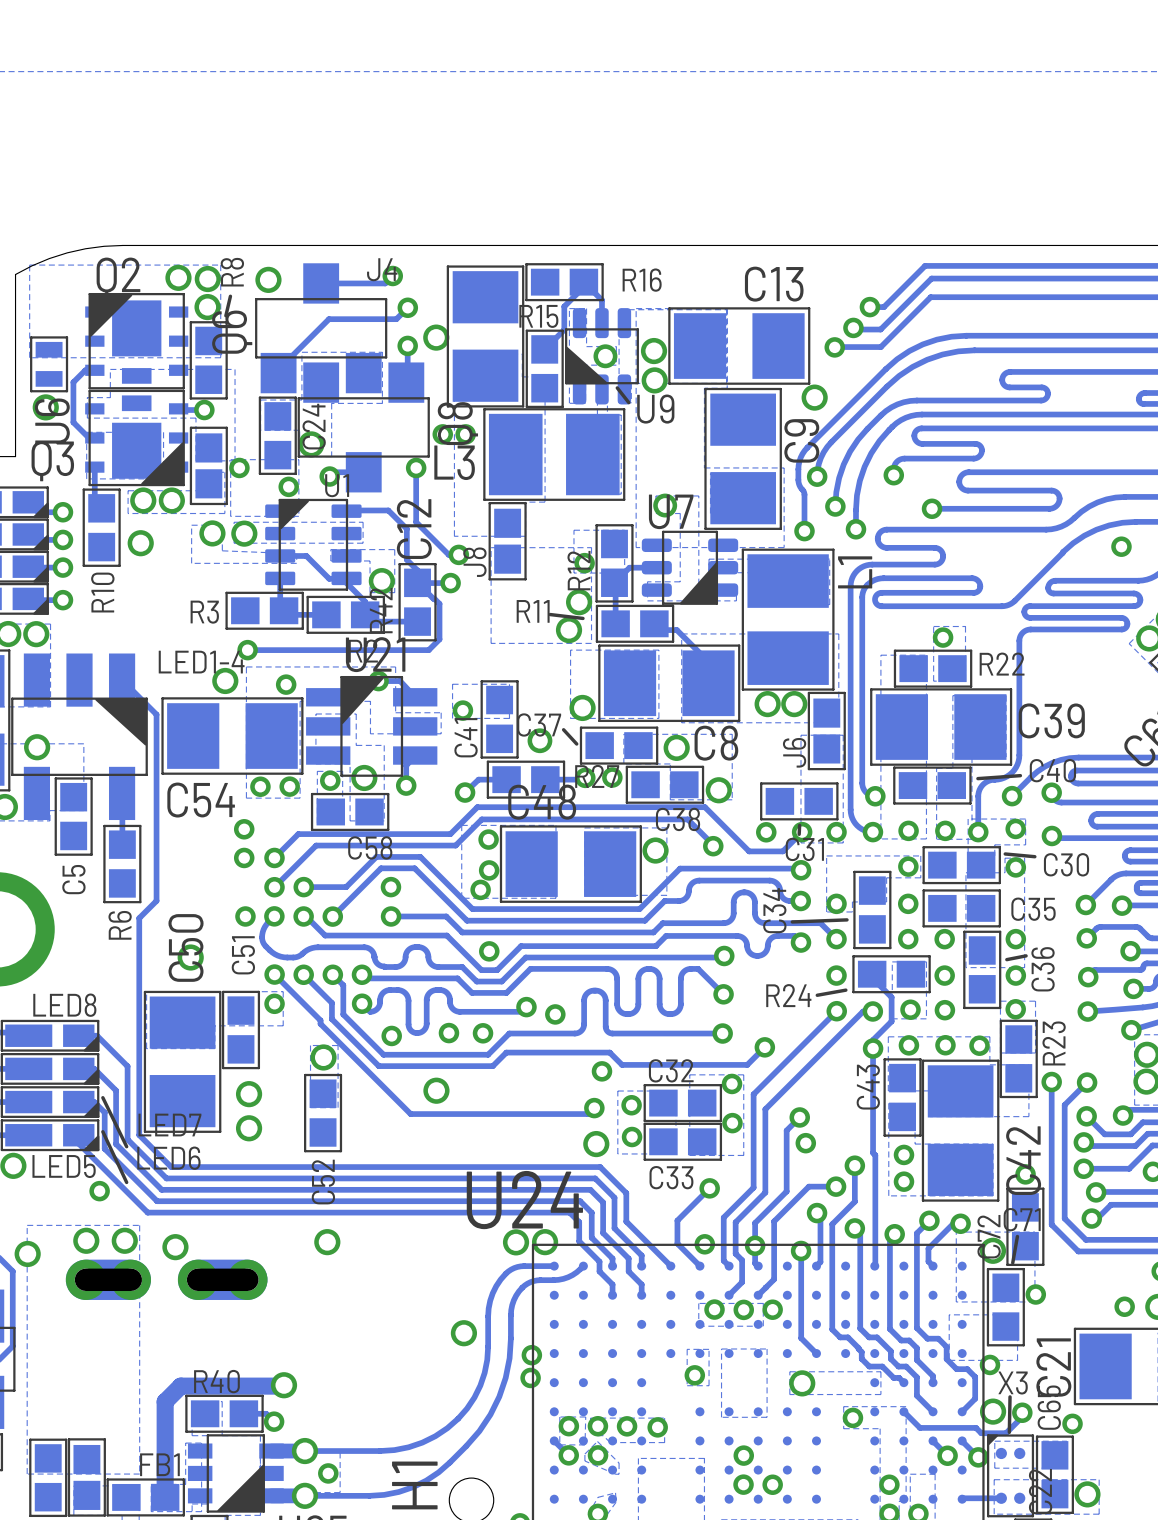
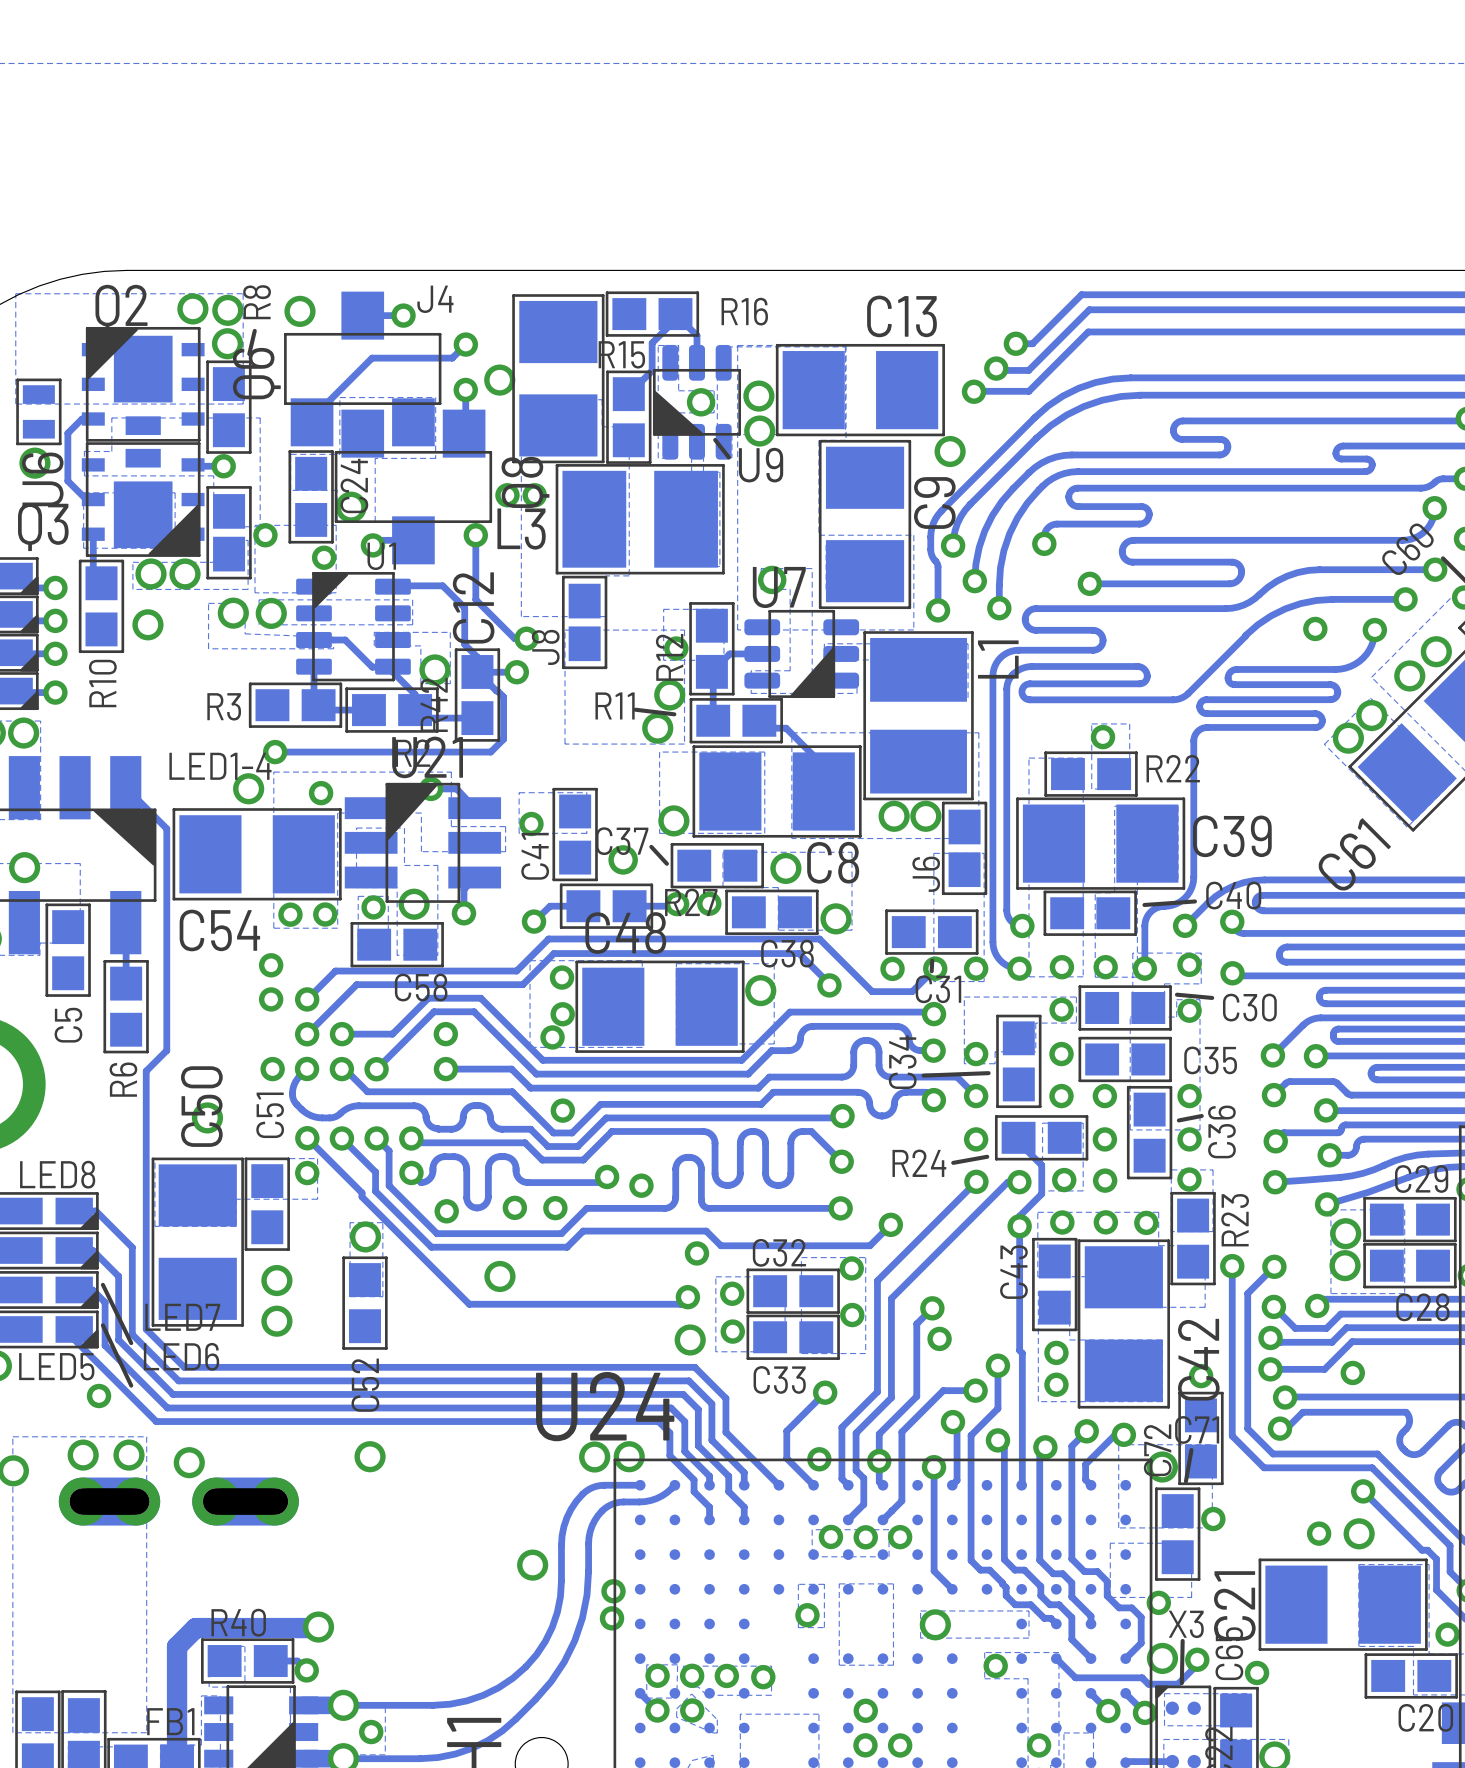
track: (392, 275) (385, 283) (355, 283) -> none
via position: (392, 275) -> (403, 315)

